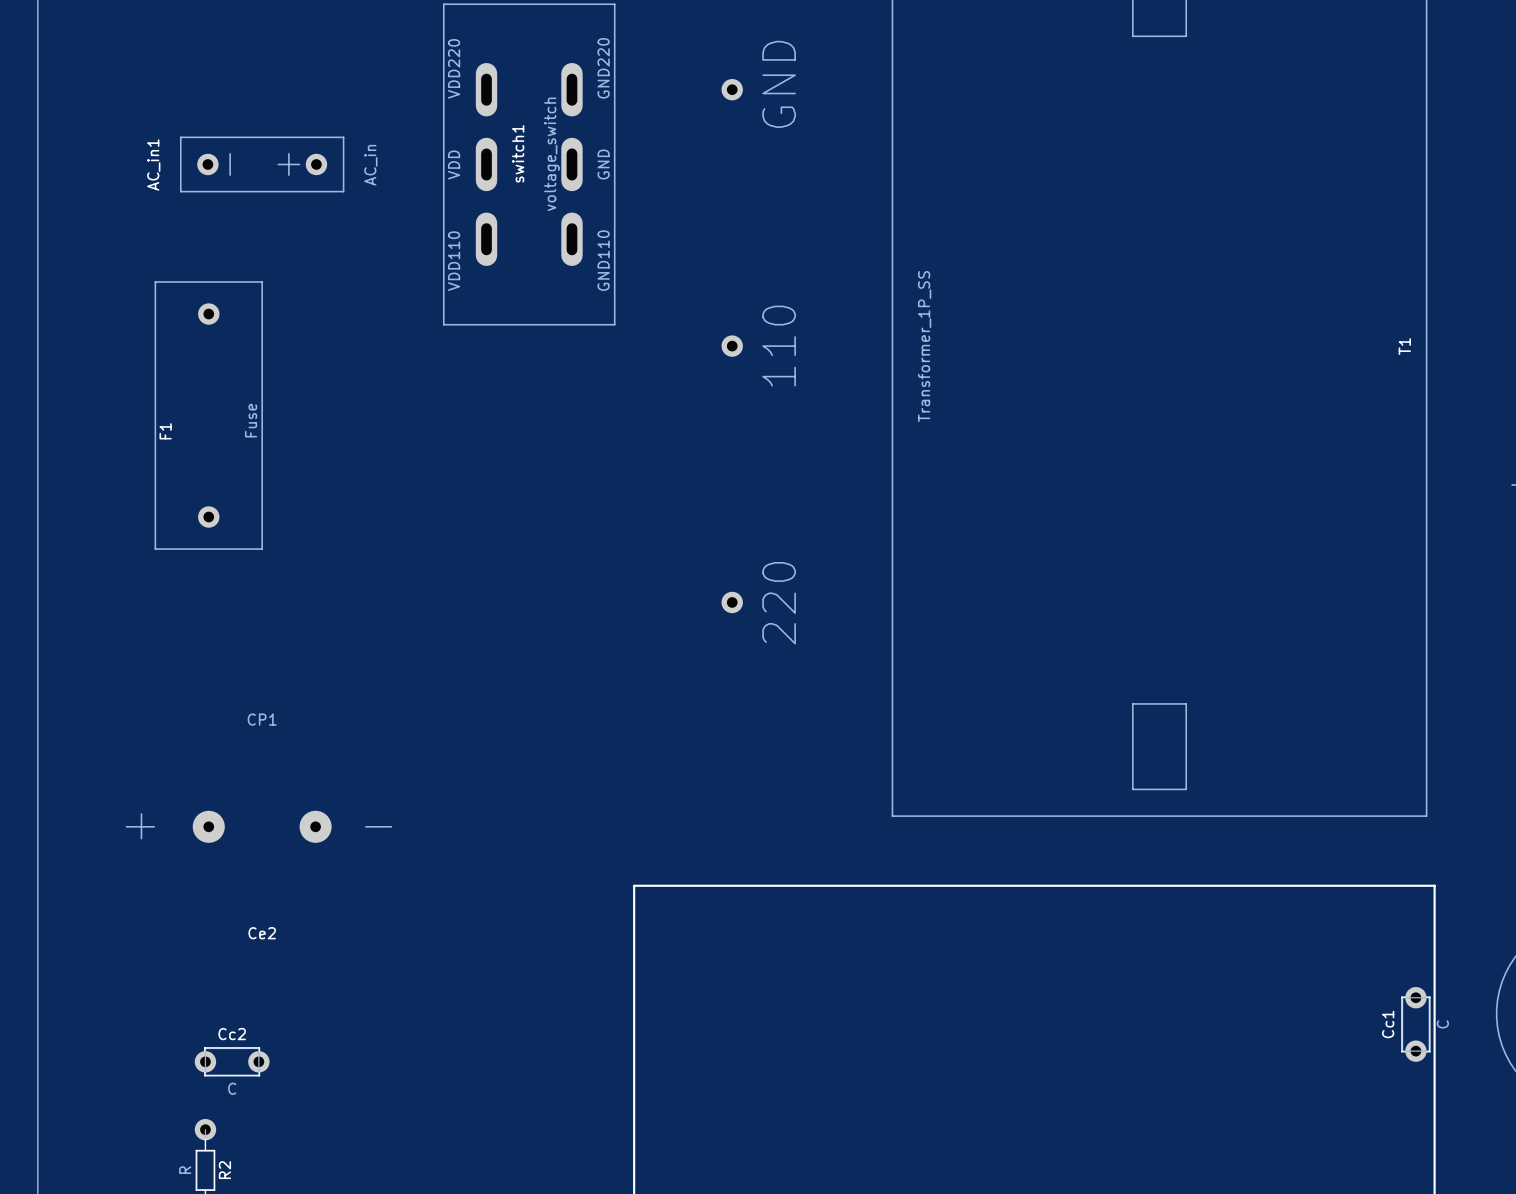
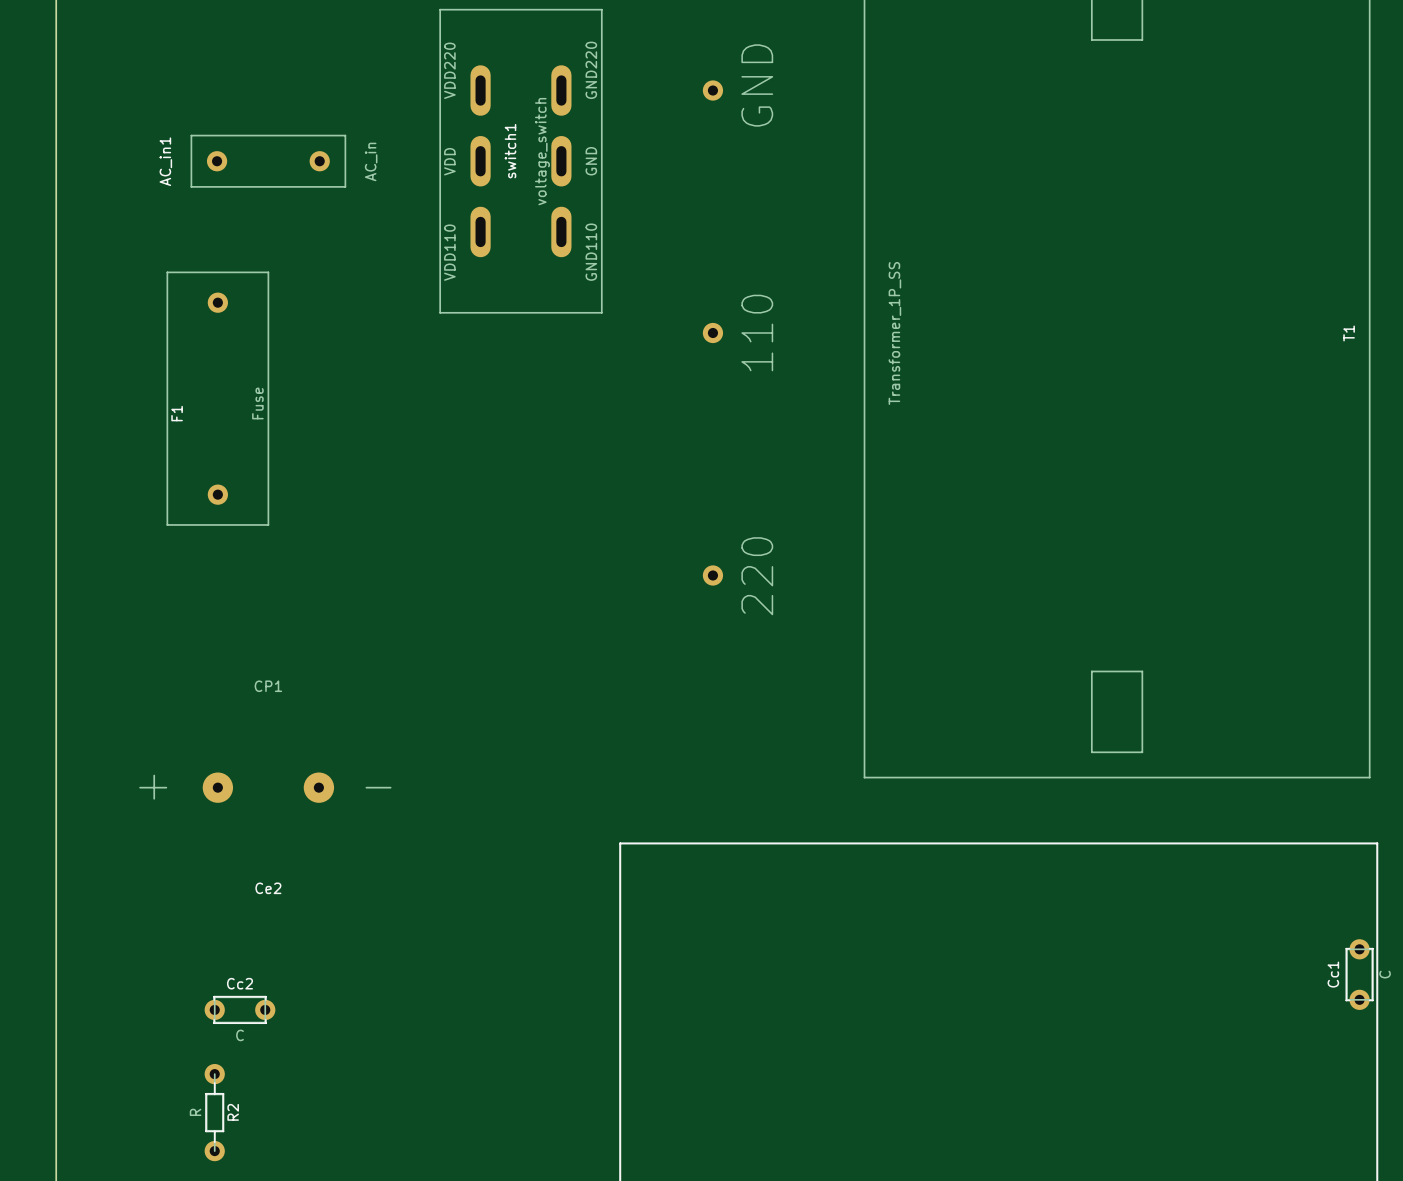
AC_in1 footprint: [179, 136, 345, 193] -> [190, 134, 347, 188]

